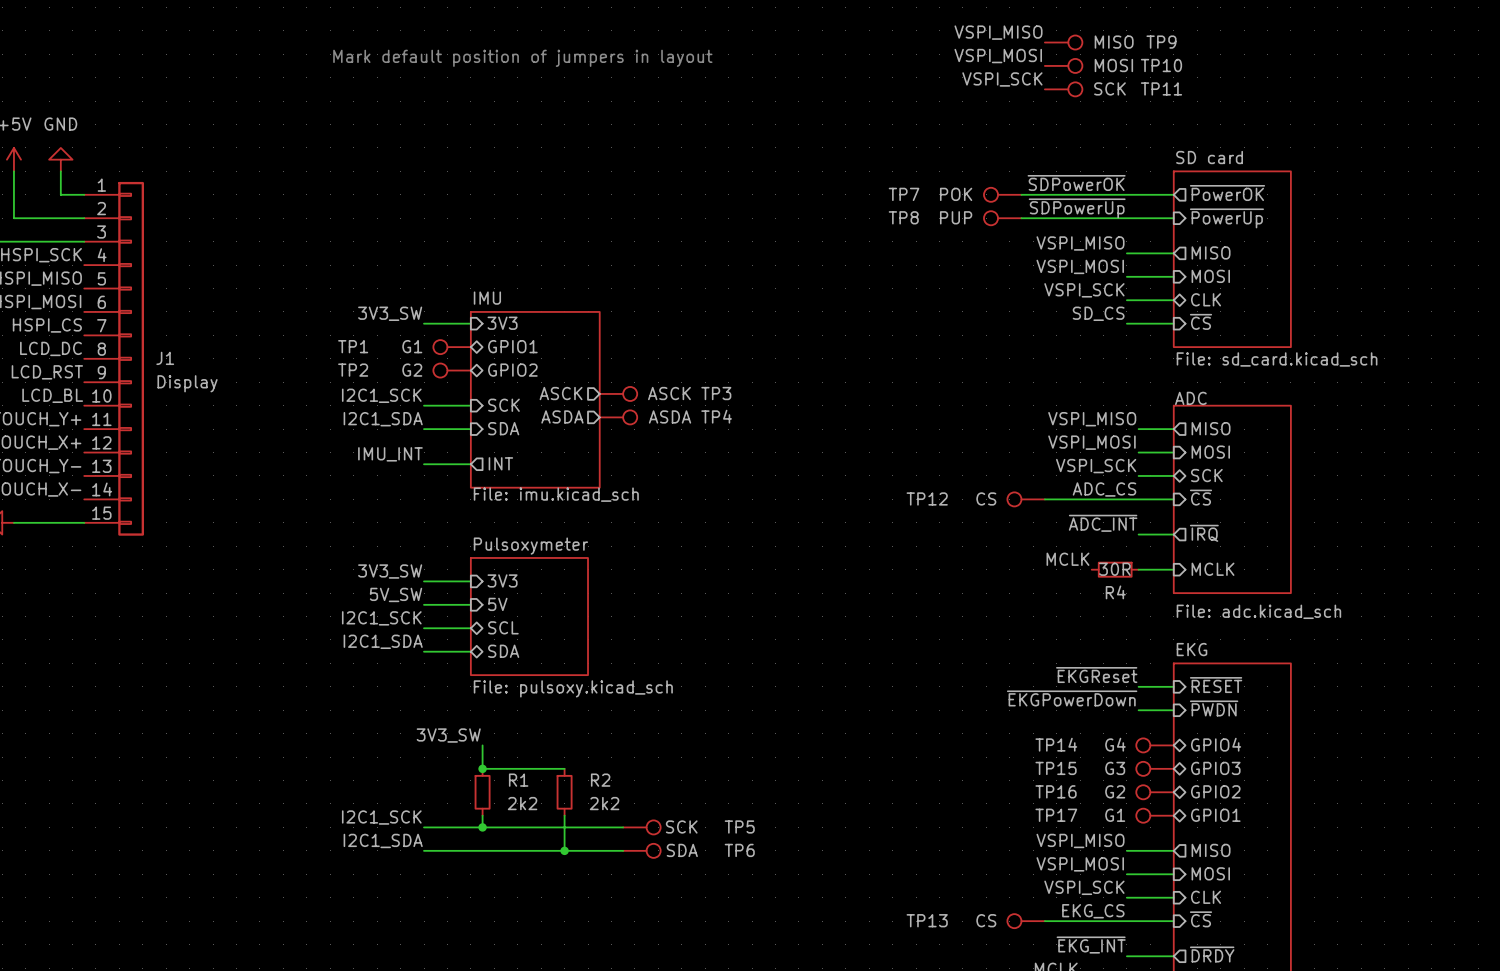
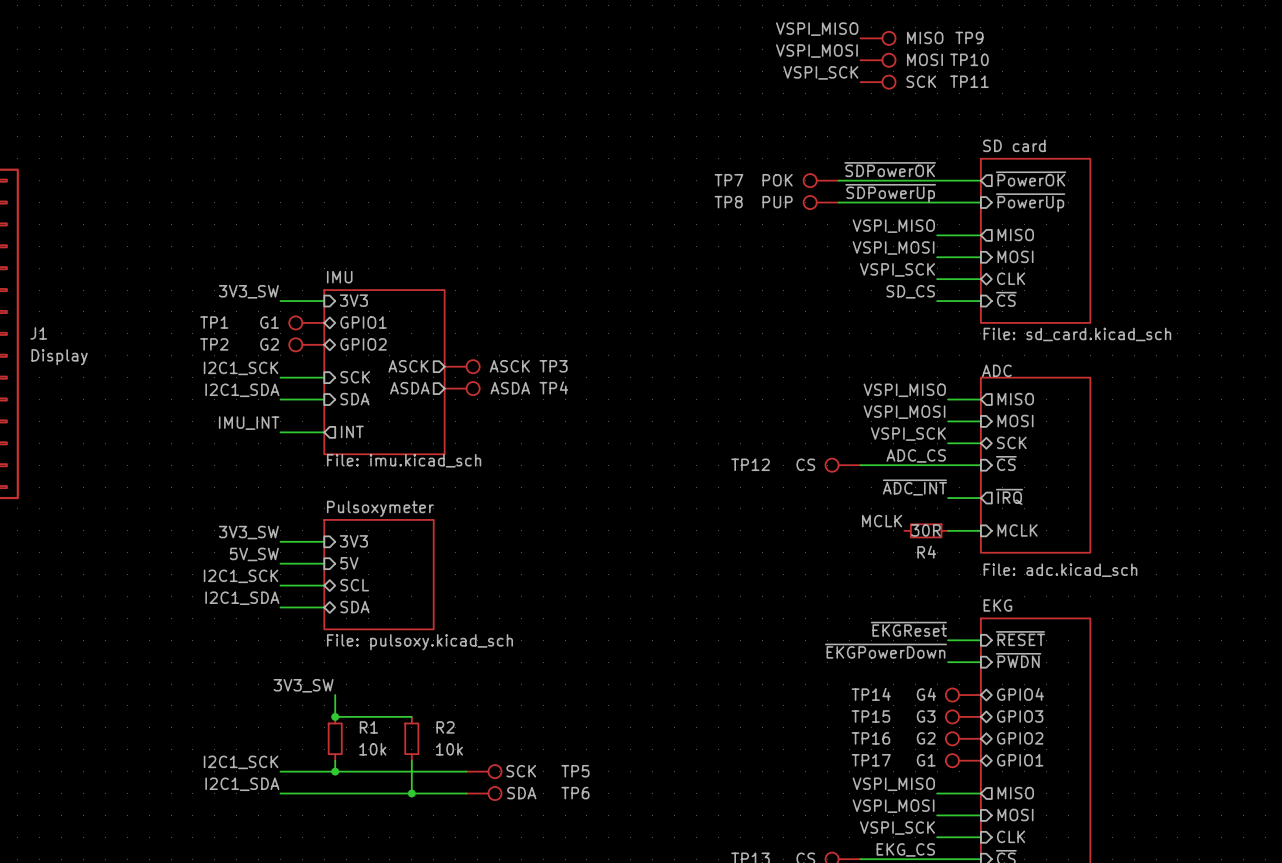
text: Mark default position of jumpers in layout (522, 58) -> none
R1 value: 2k2 (522, 803) -> 10k (372, 749)
R2 value: 2k2 (604, 803) -> 10k (449, 749)

